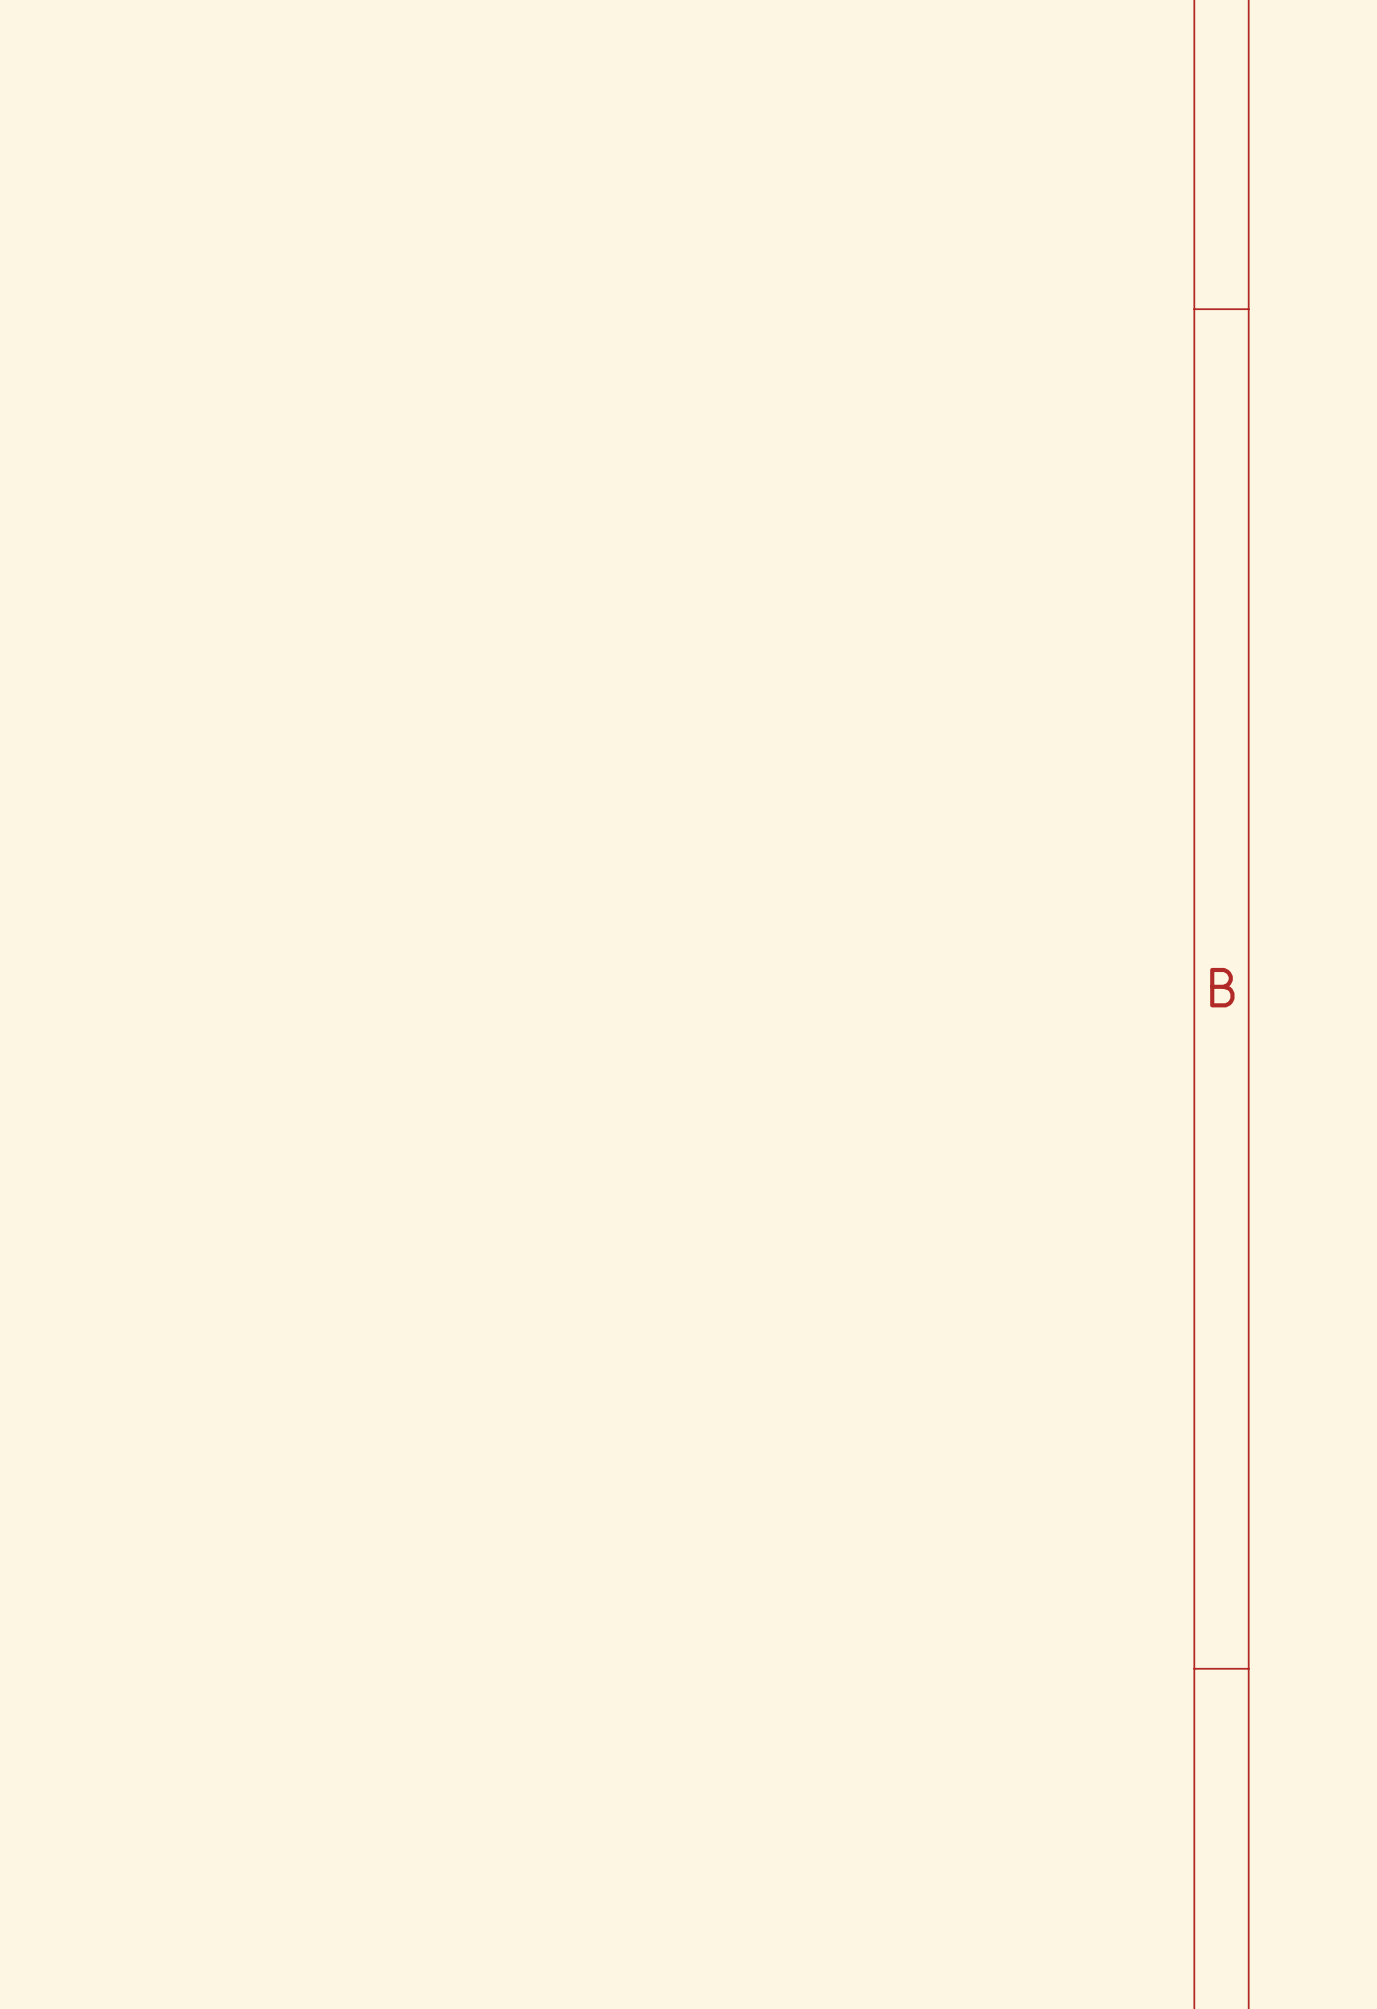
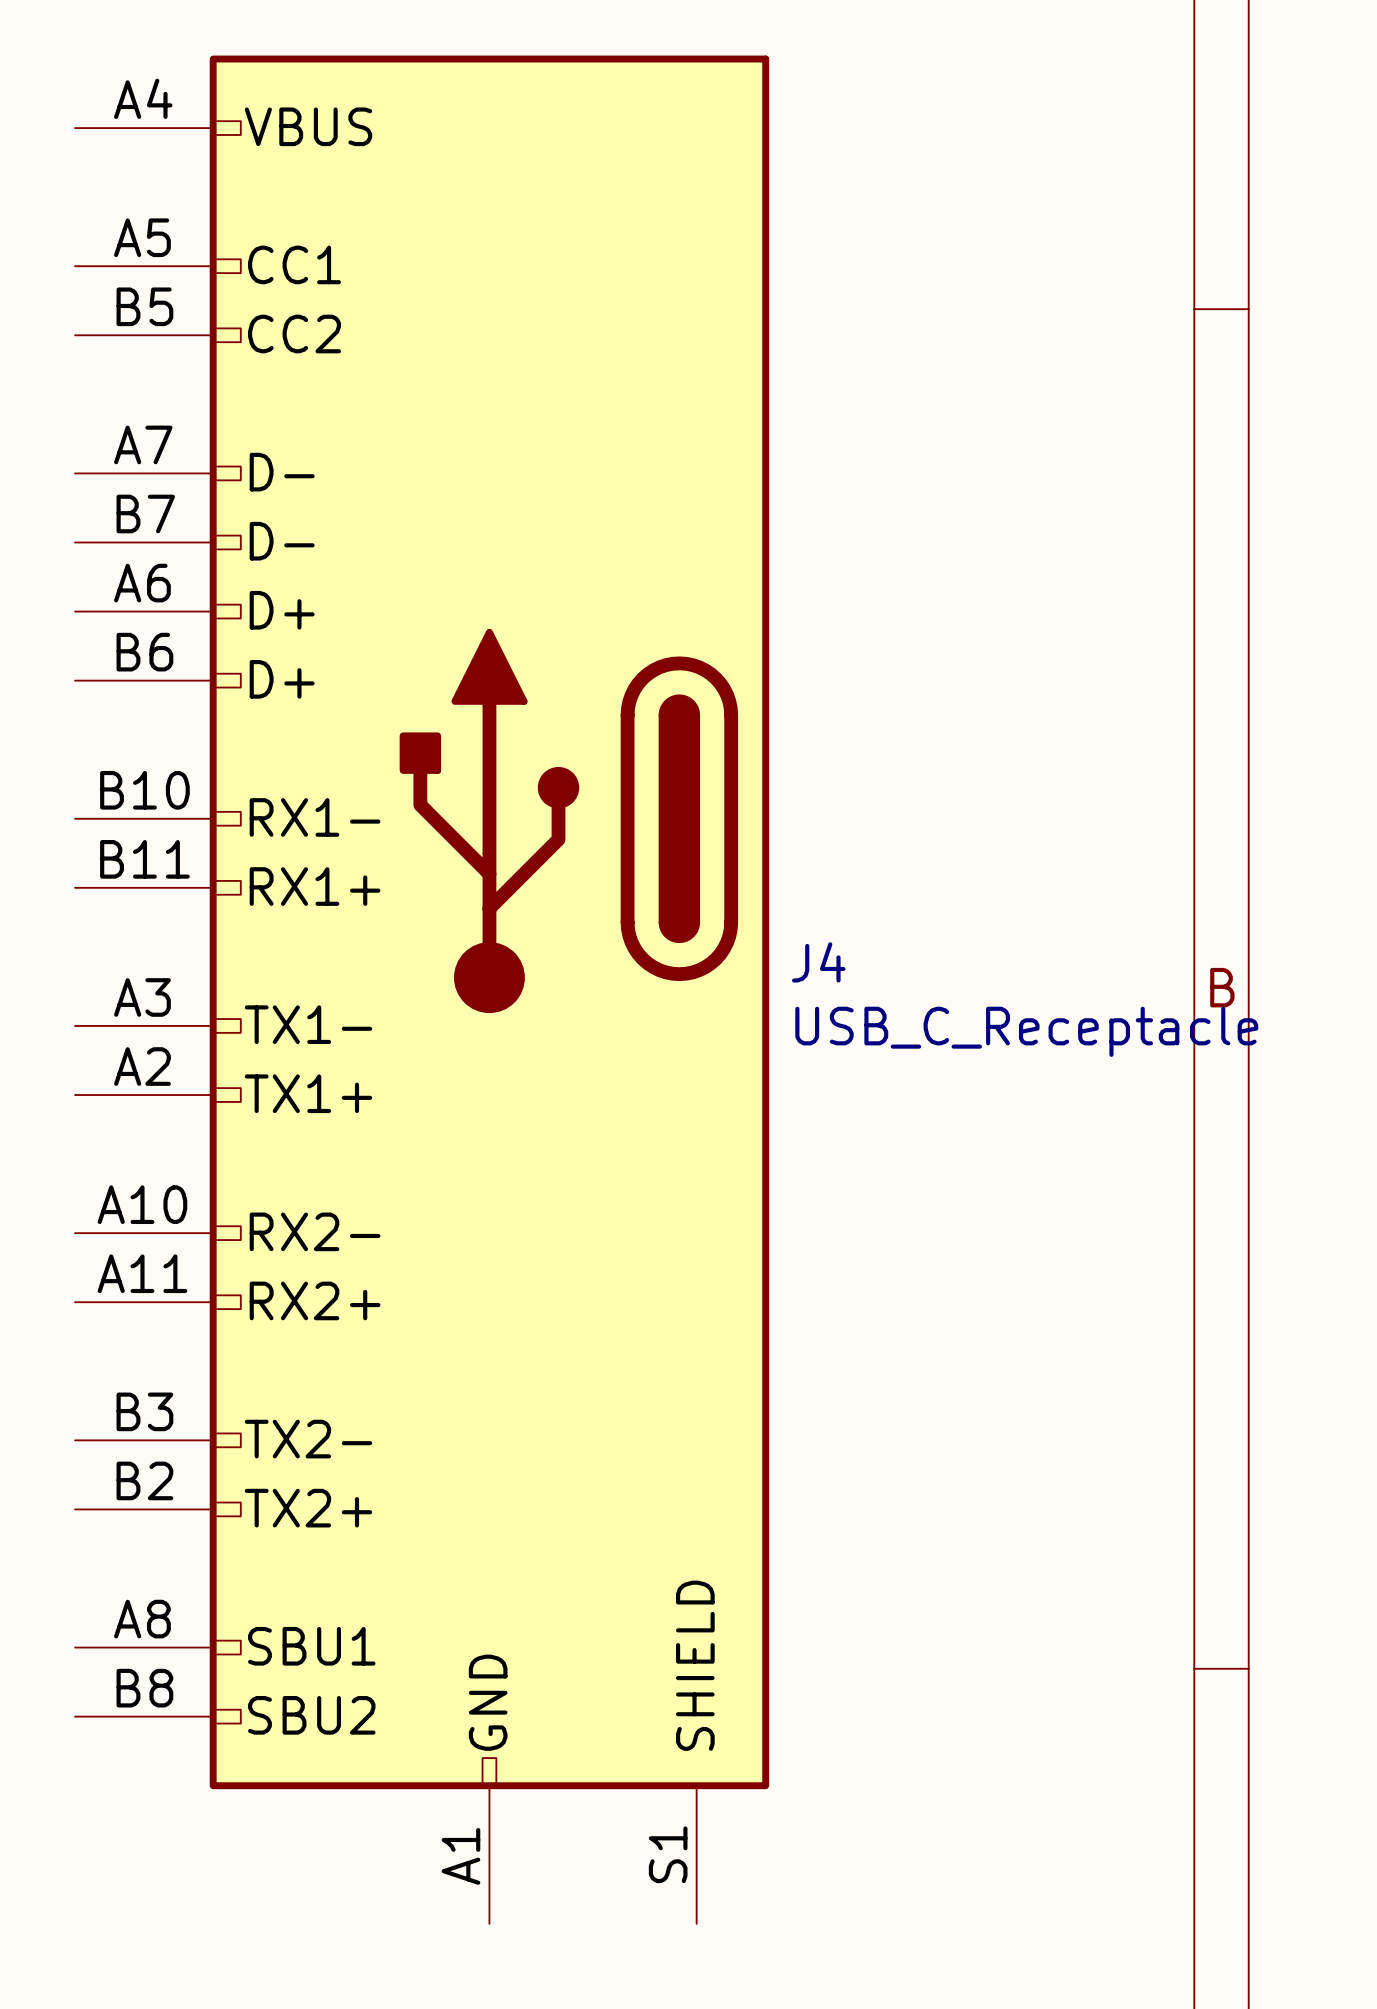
J4: none -> USB_C_Receptacle (422, 989)

